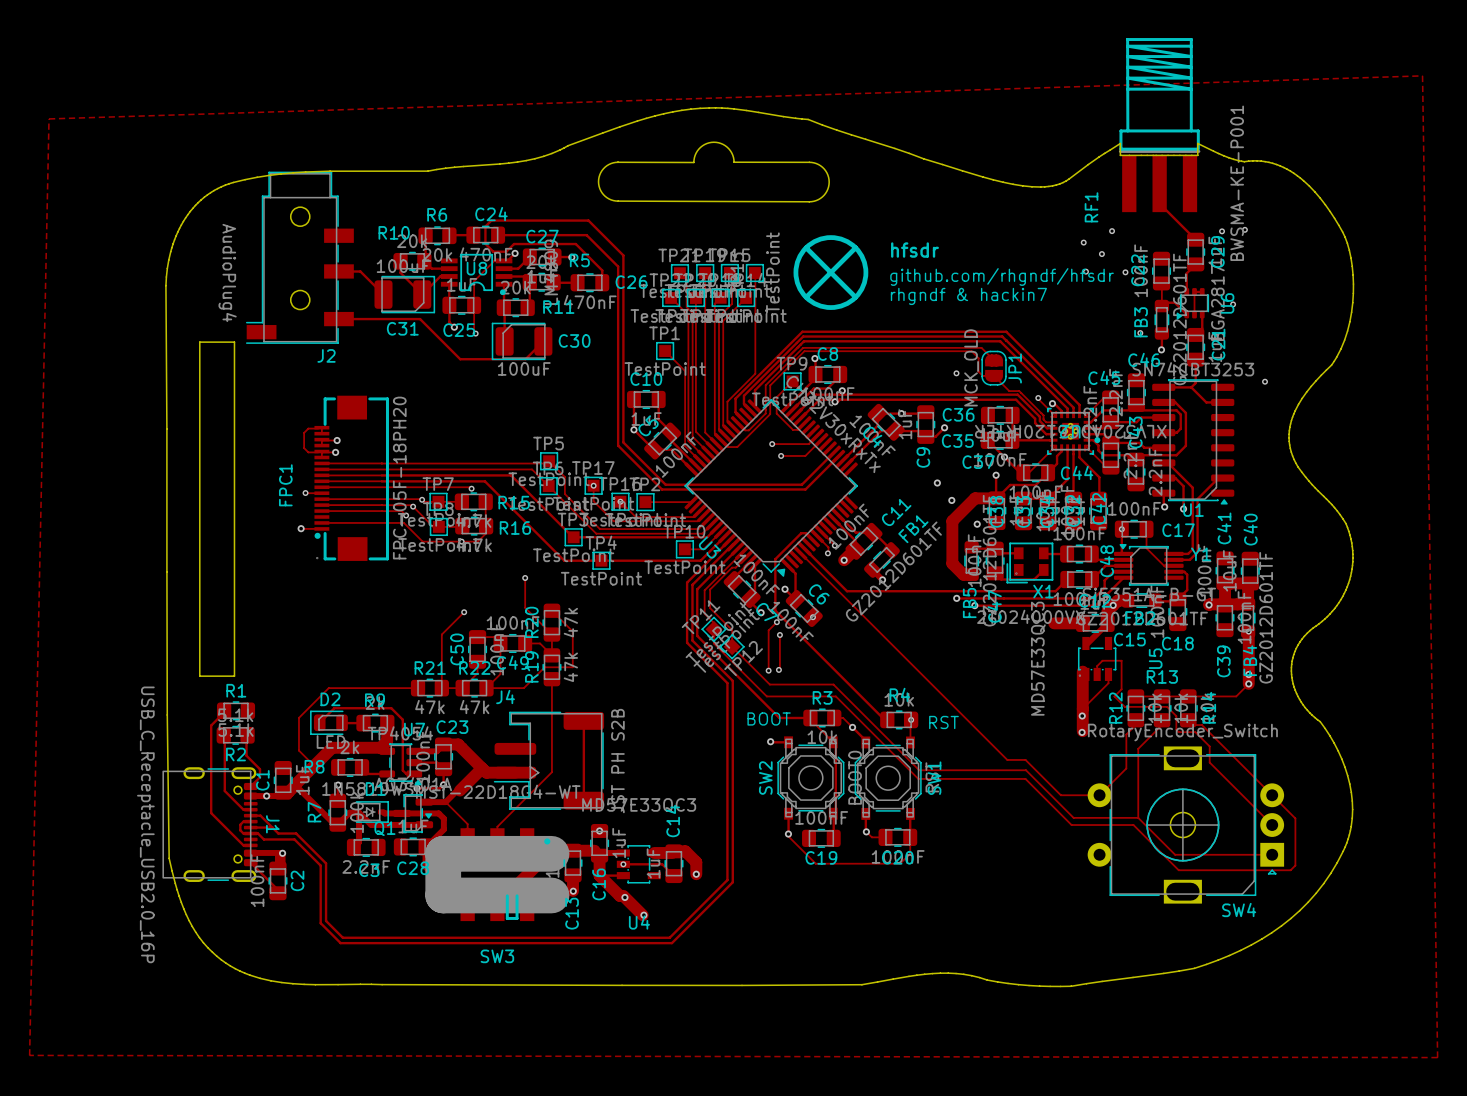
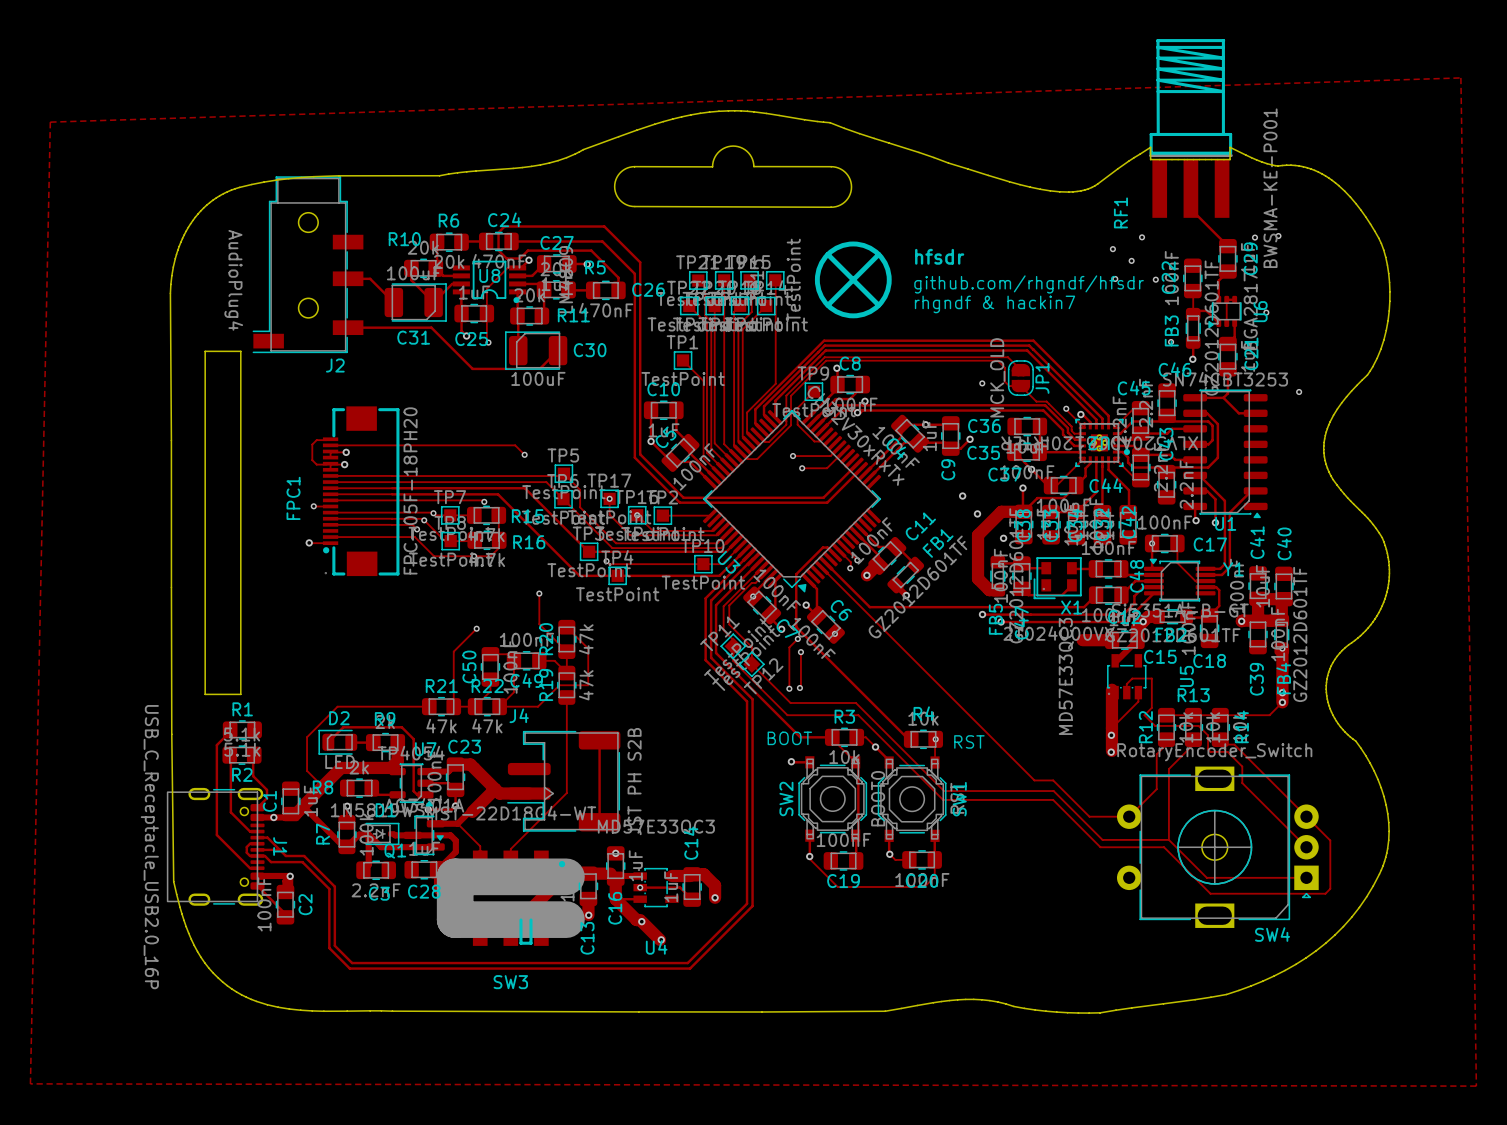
track: (321, 427) (321, 433) -> (524, 454) (515, 445) (330, 445)
via: none -> (524, 454)
track: none -> (606, 561) (609, 564) (703, 564)
via: none -> (606, 561)
via: none -> (753, 596)

